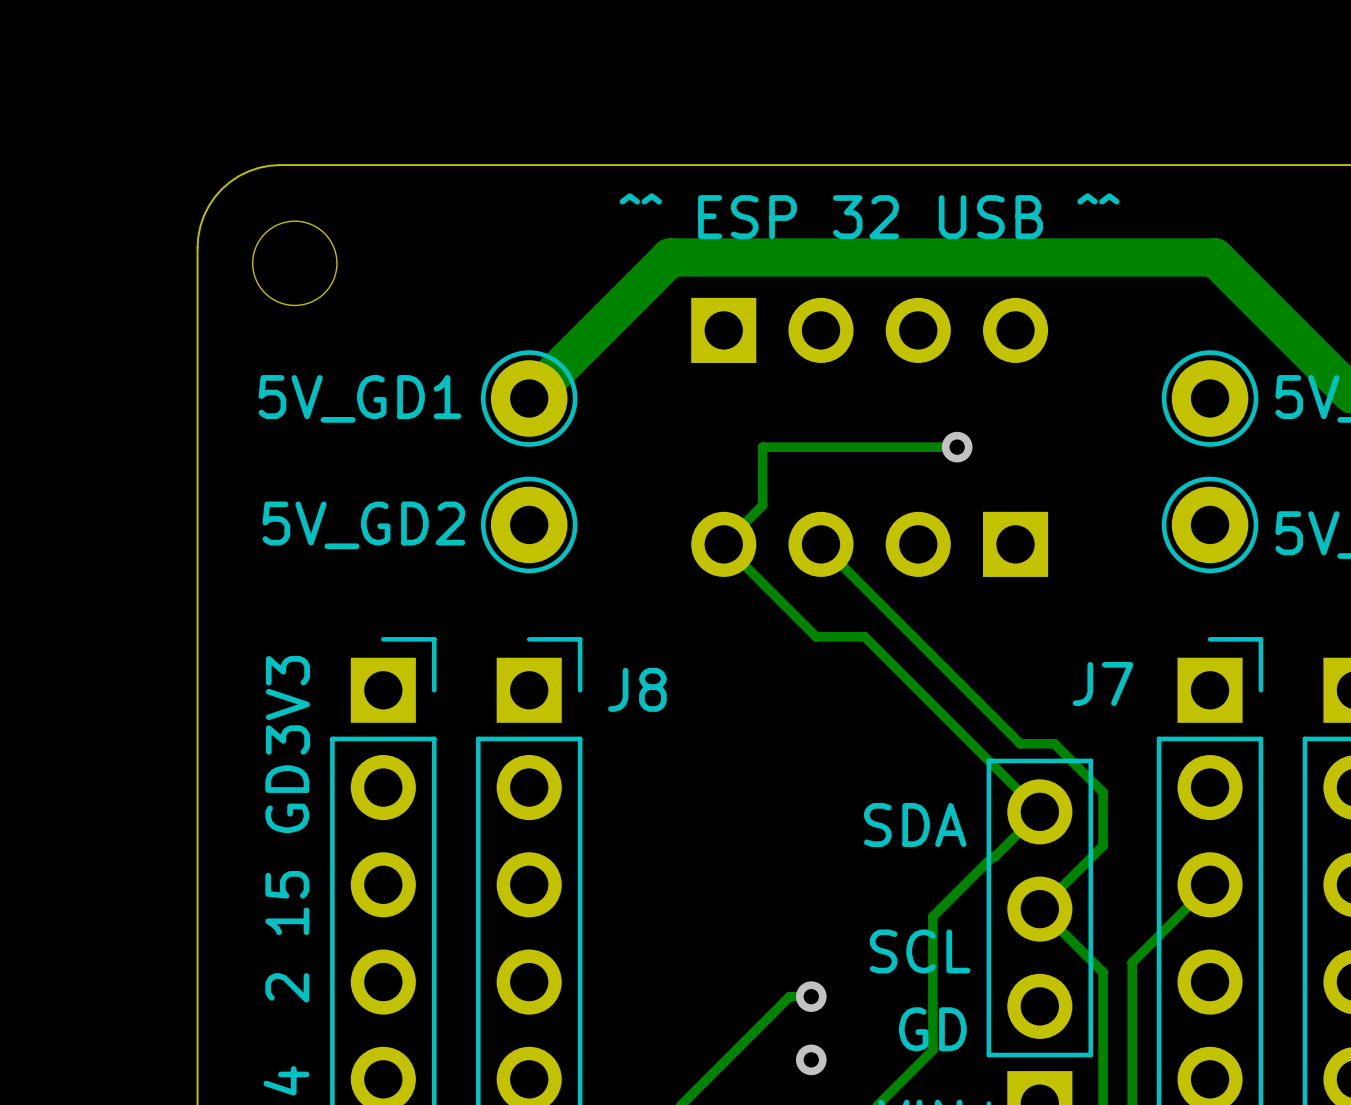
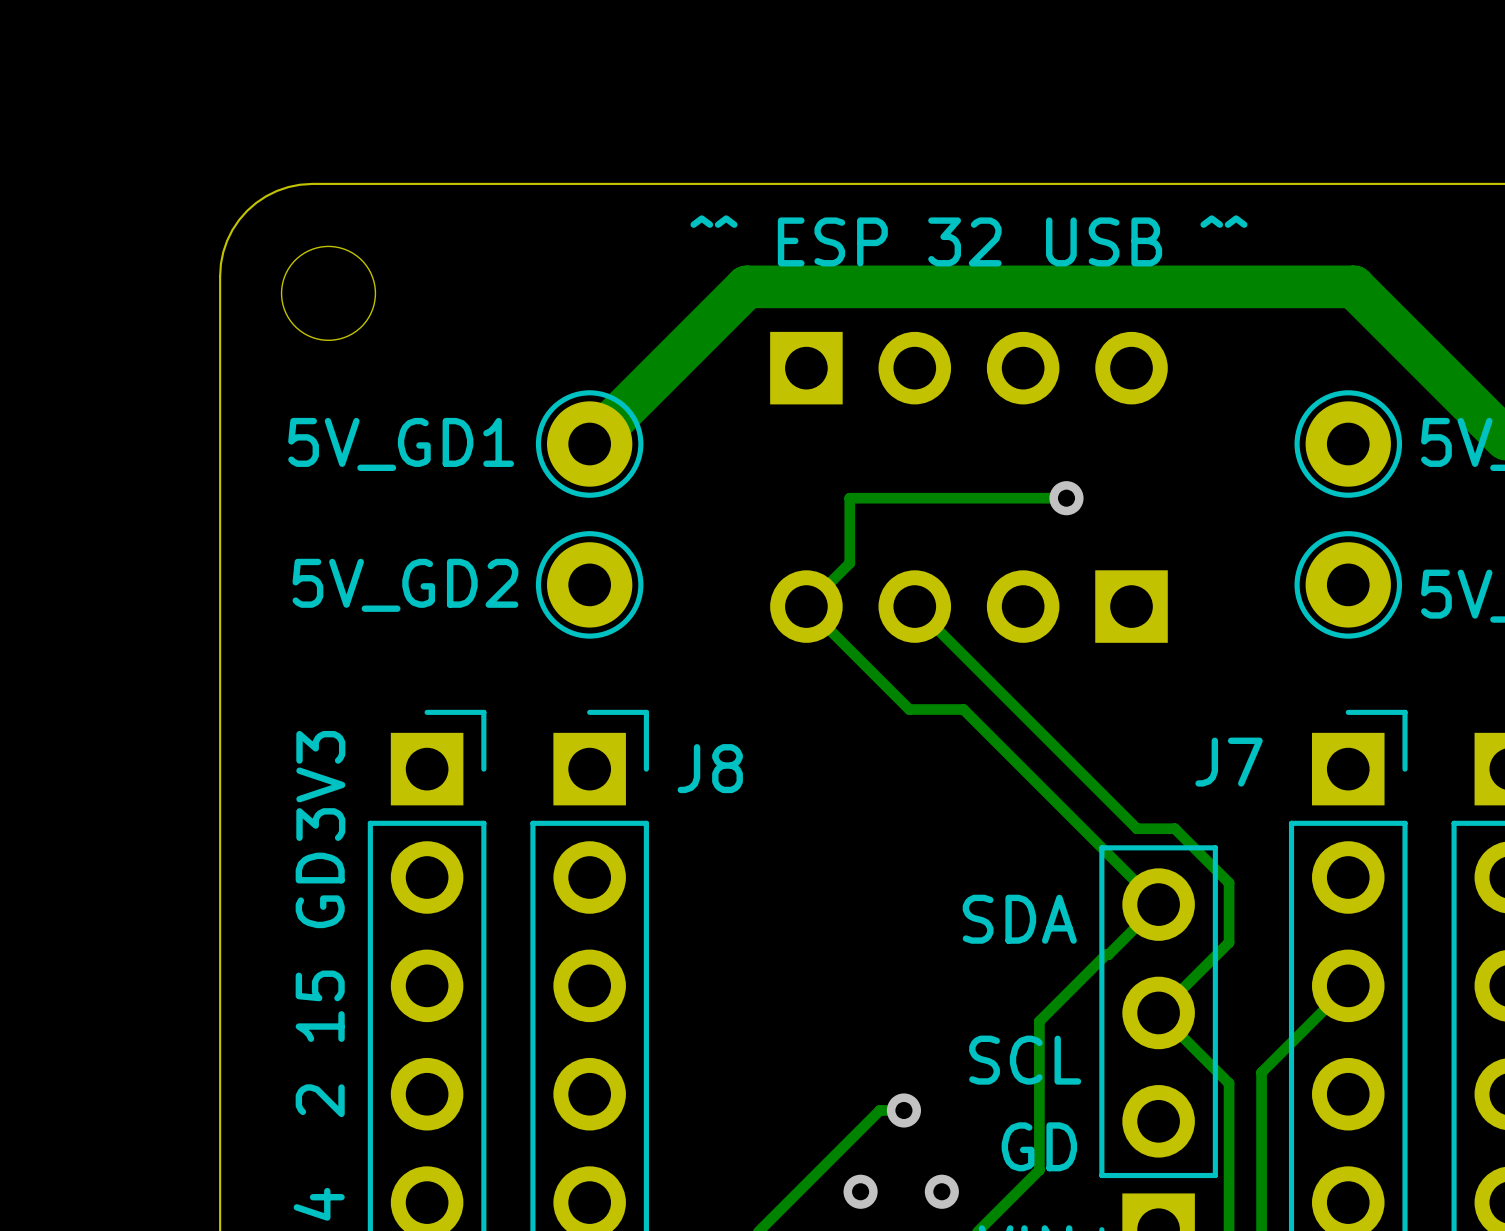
via: (811, 1059) -> none
via: none -> (860, 1191)
via: none -> (941, 1191)

